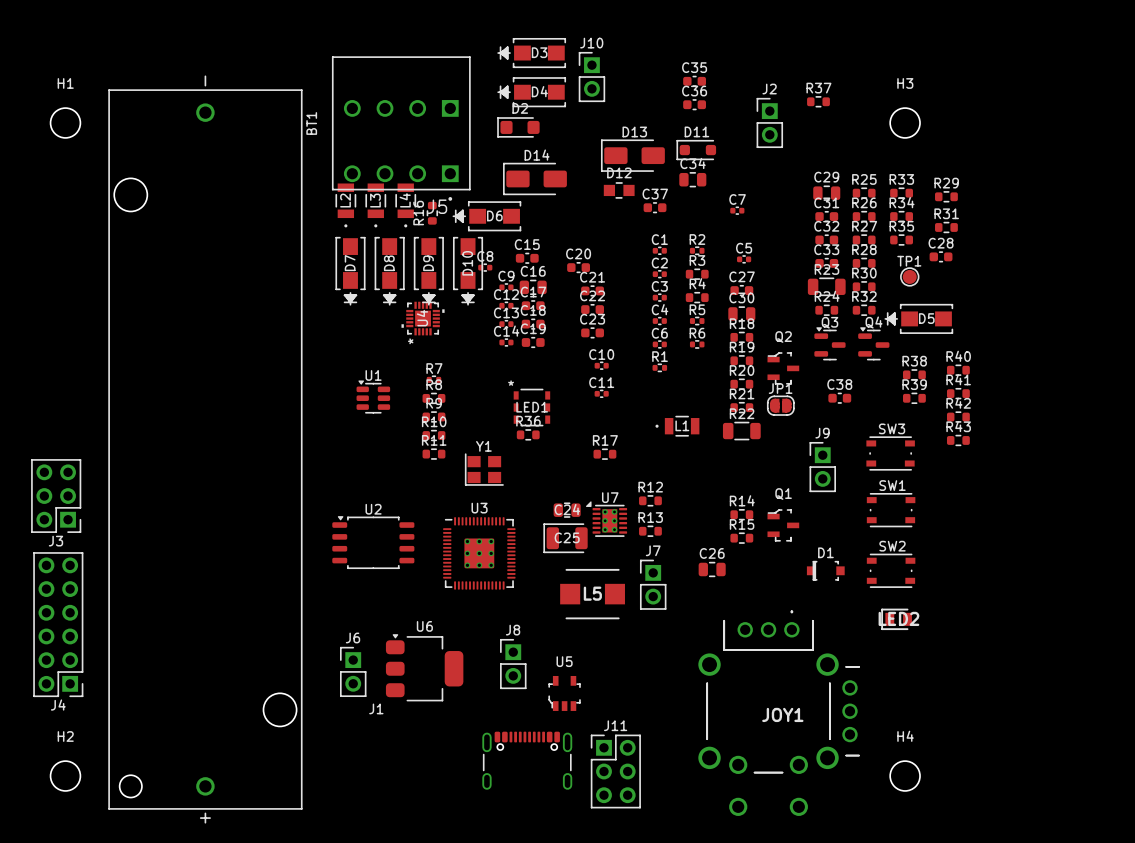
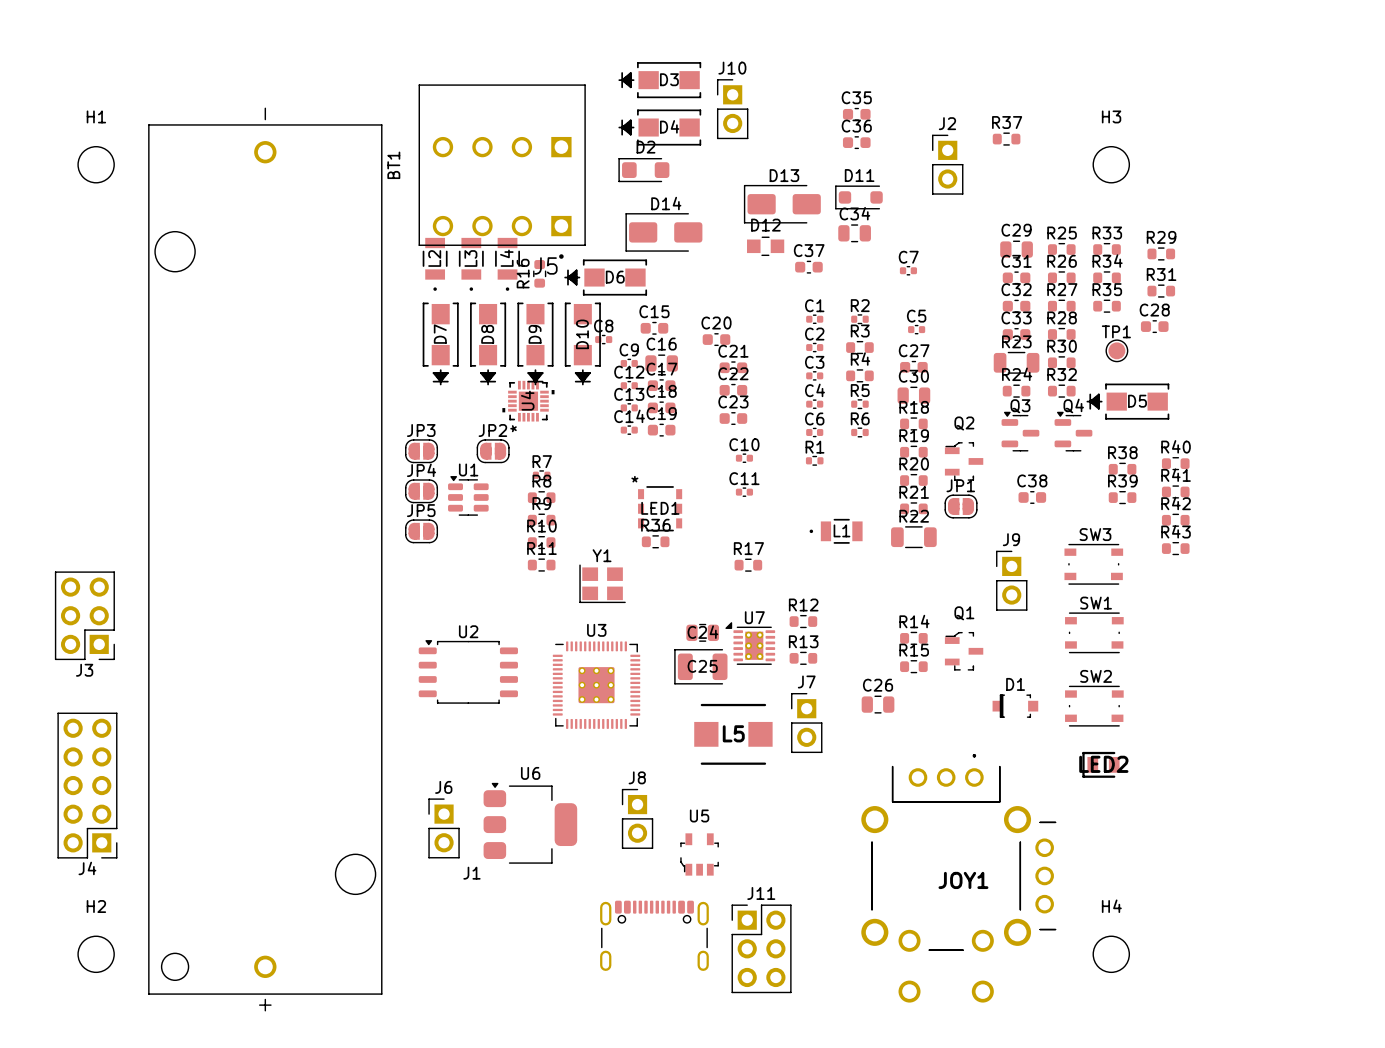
JP3: none -> (421, 451)
JP2: none -> (493, 451)
JP4: none -> (421, 491)
JP5: none -> (421, 531)
J4 footprint: [33, 552, 84, 697] -> [57, 712, 118, 859]

